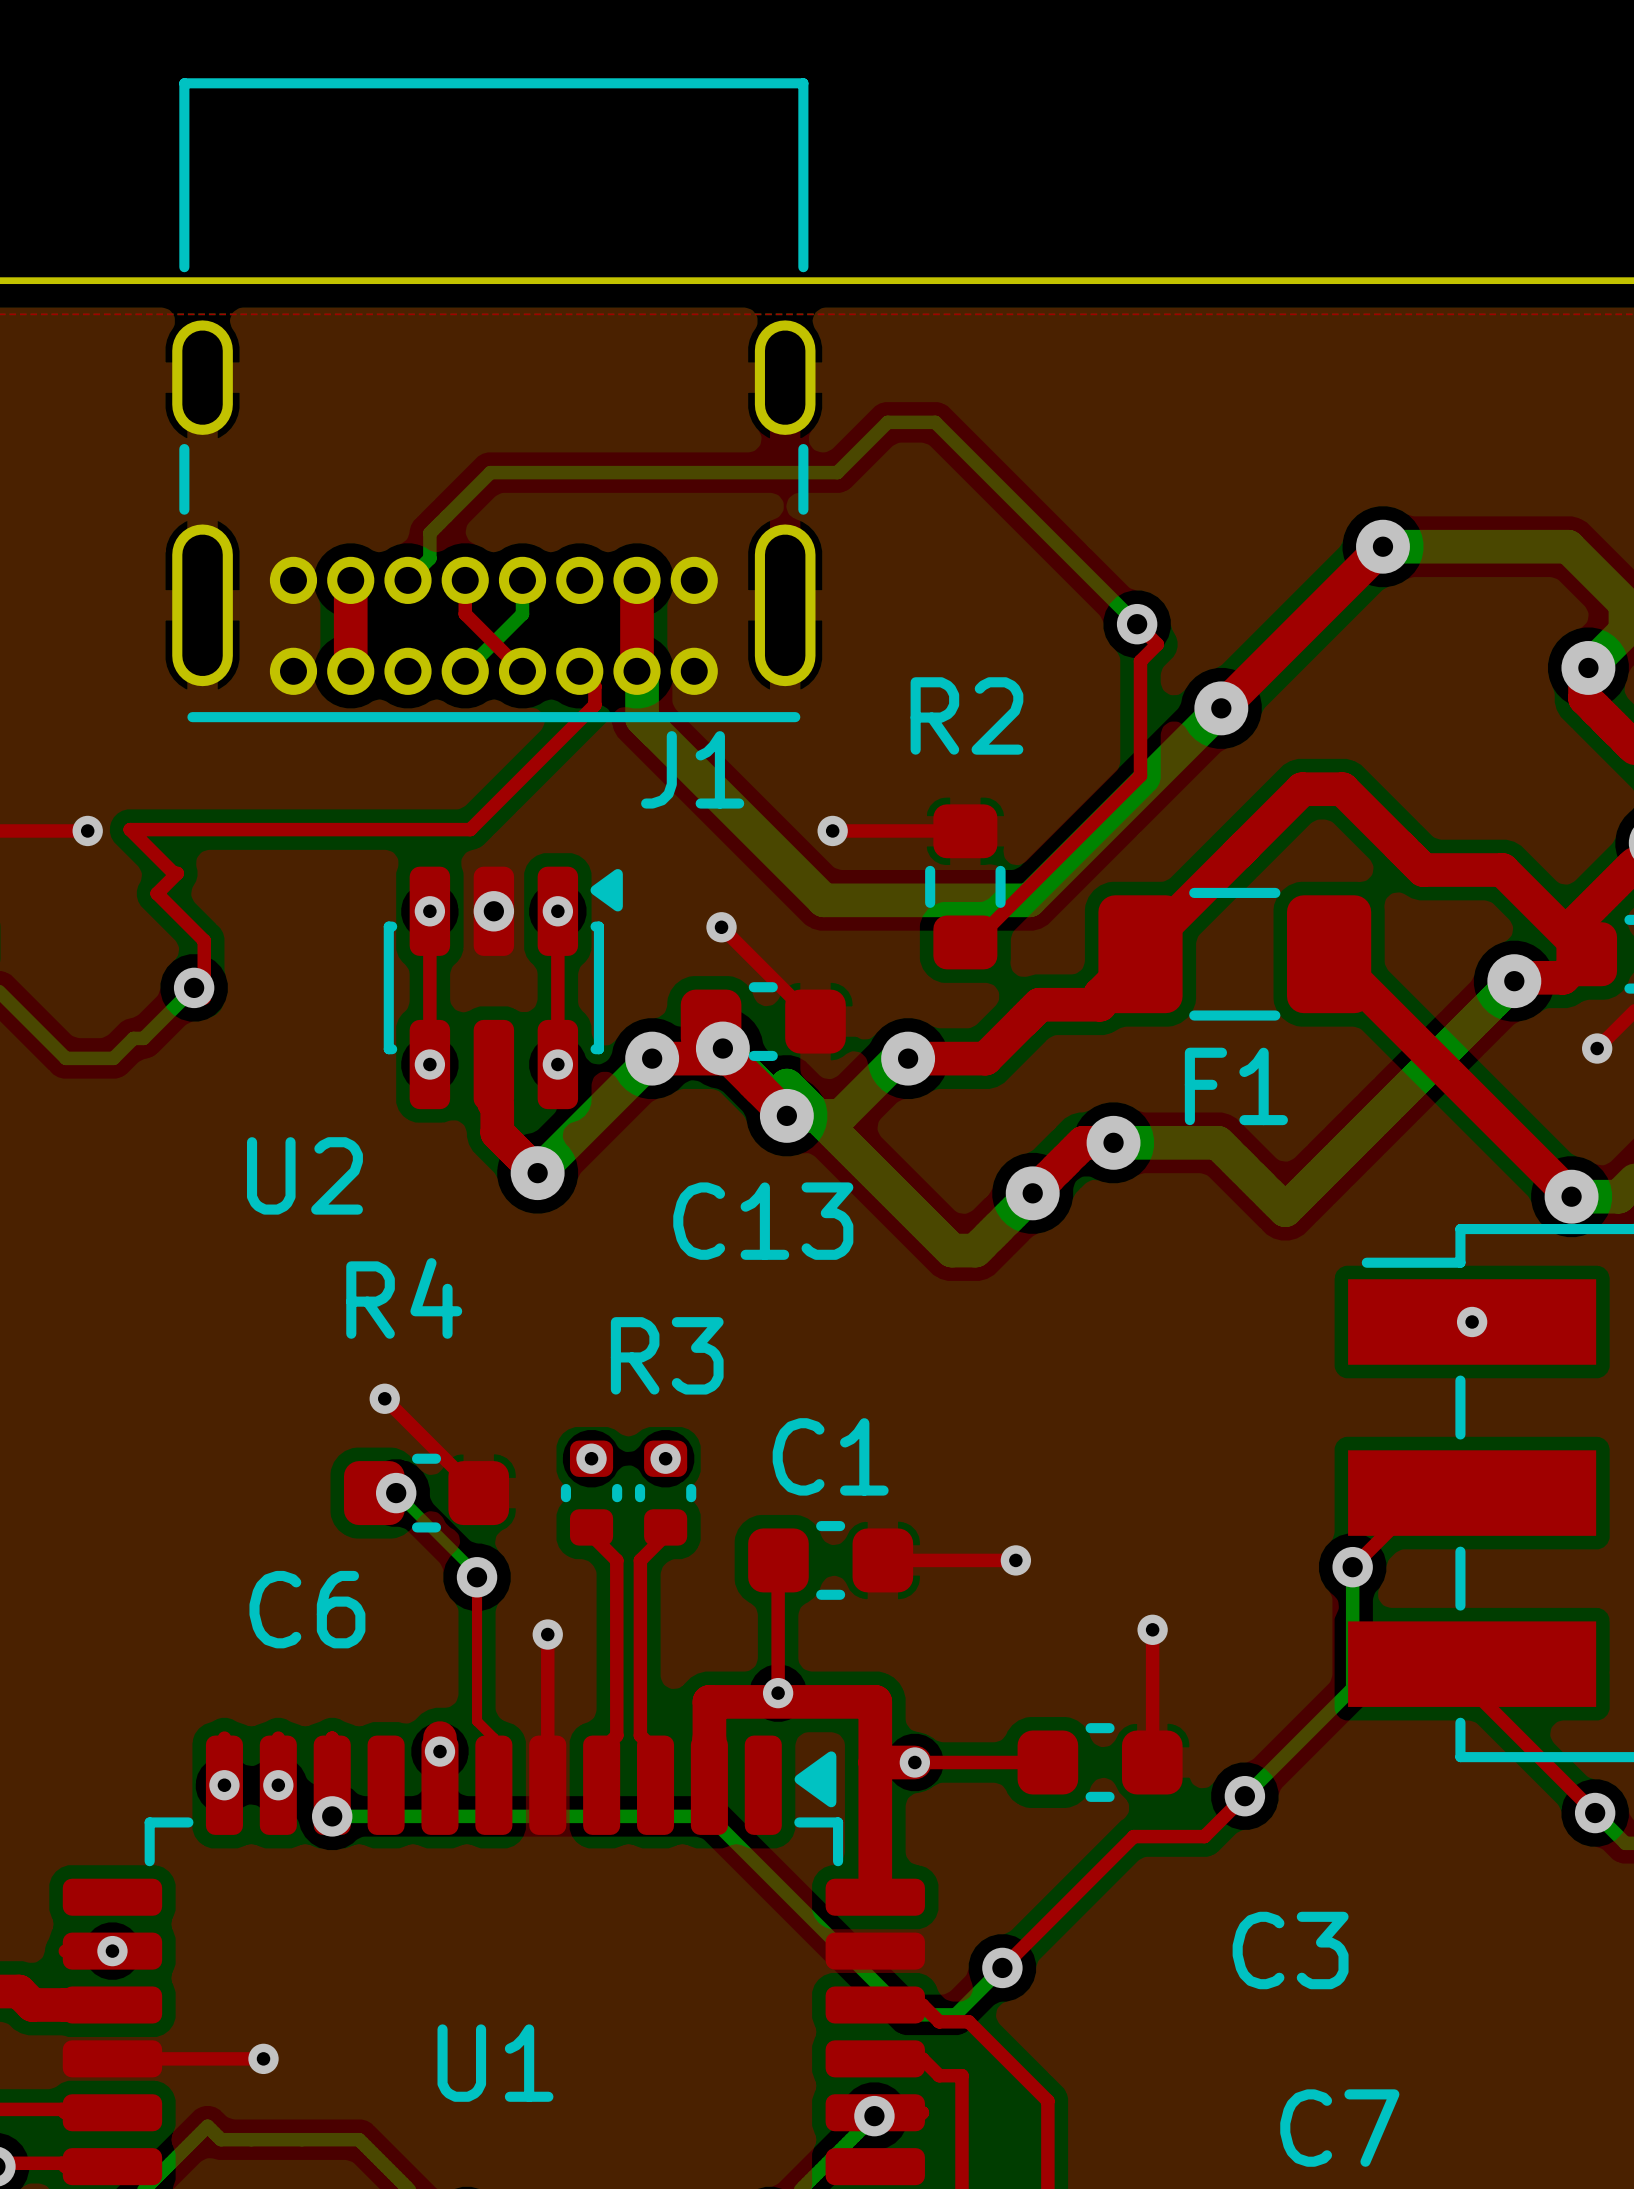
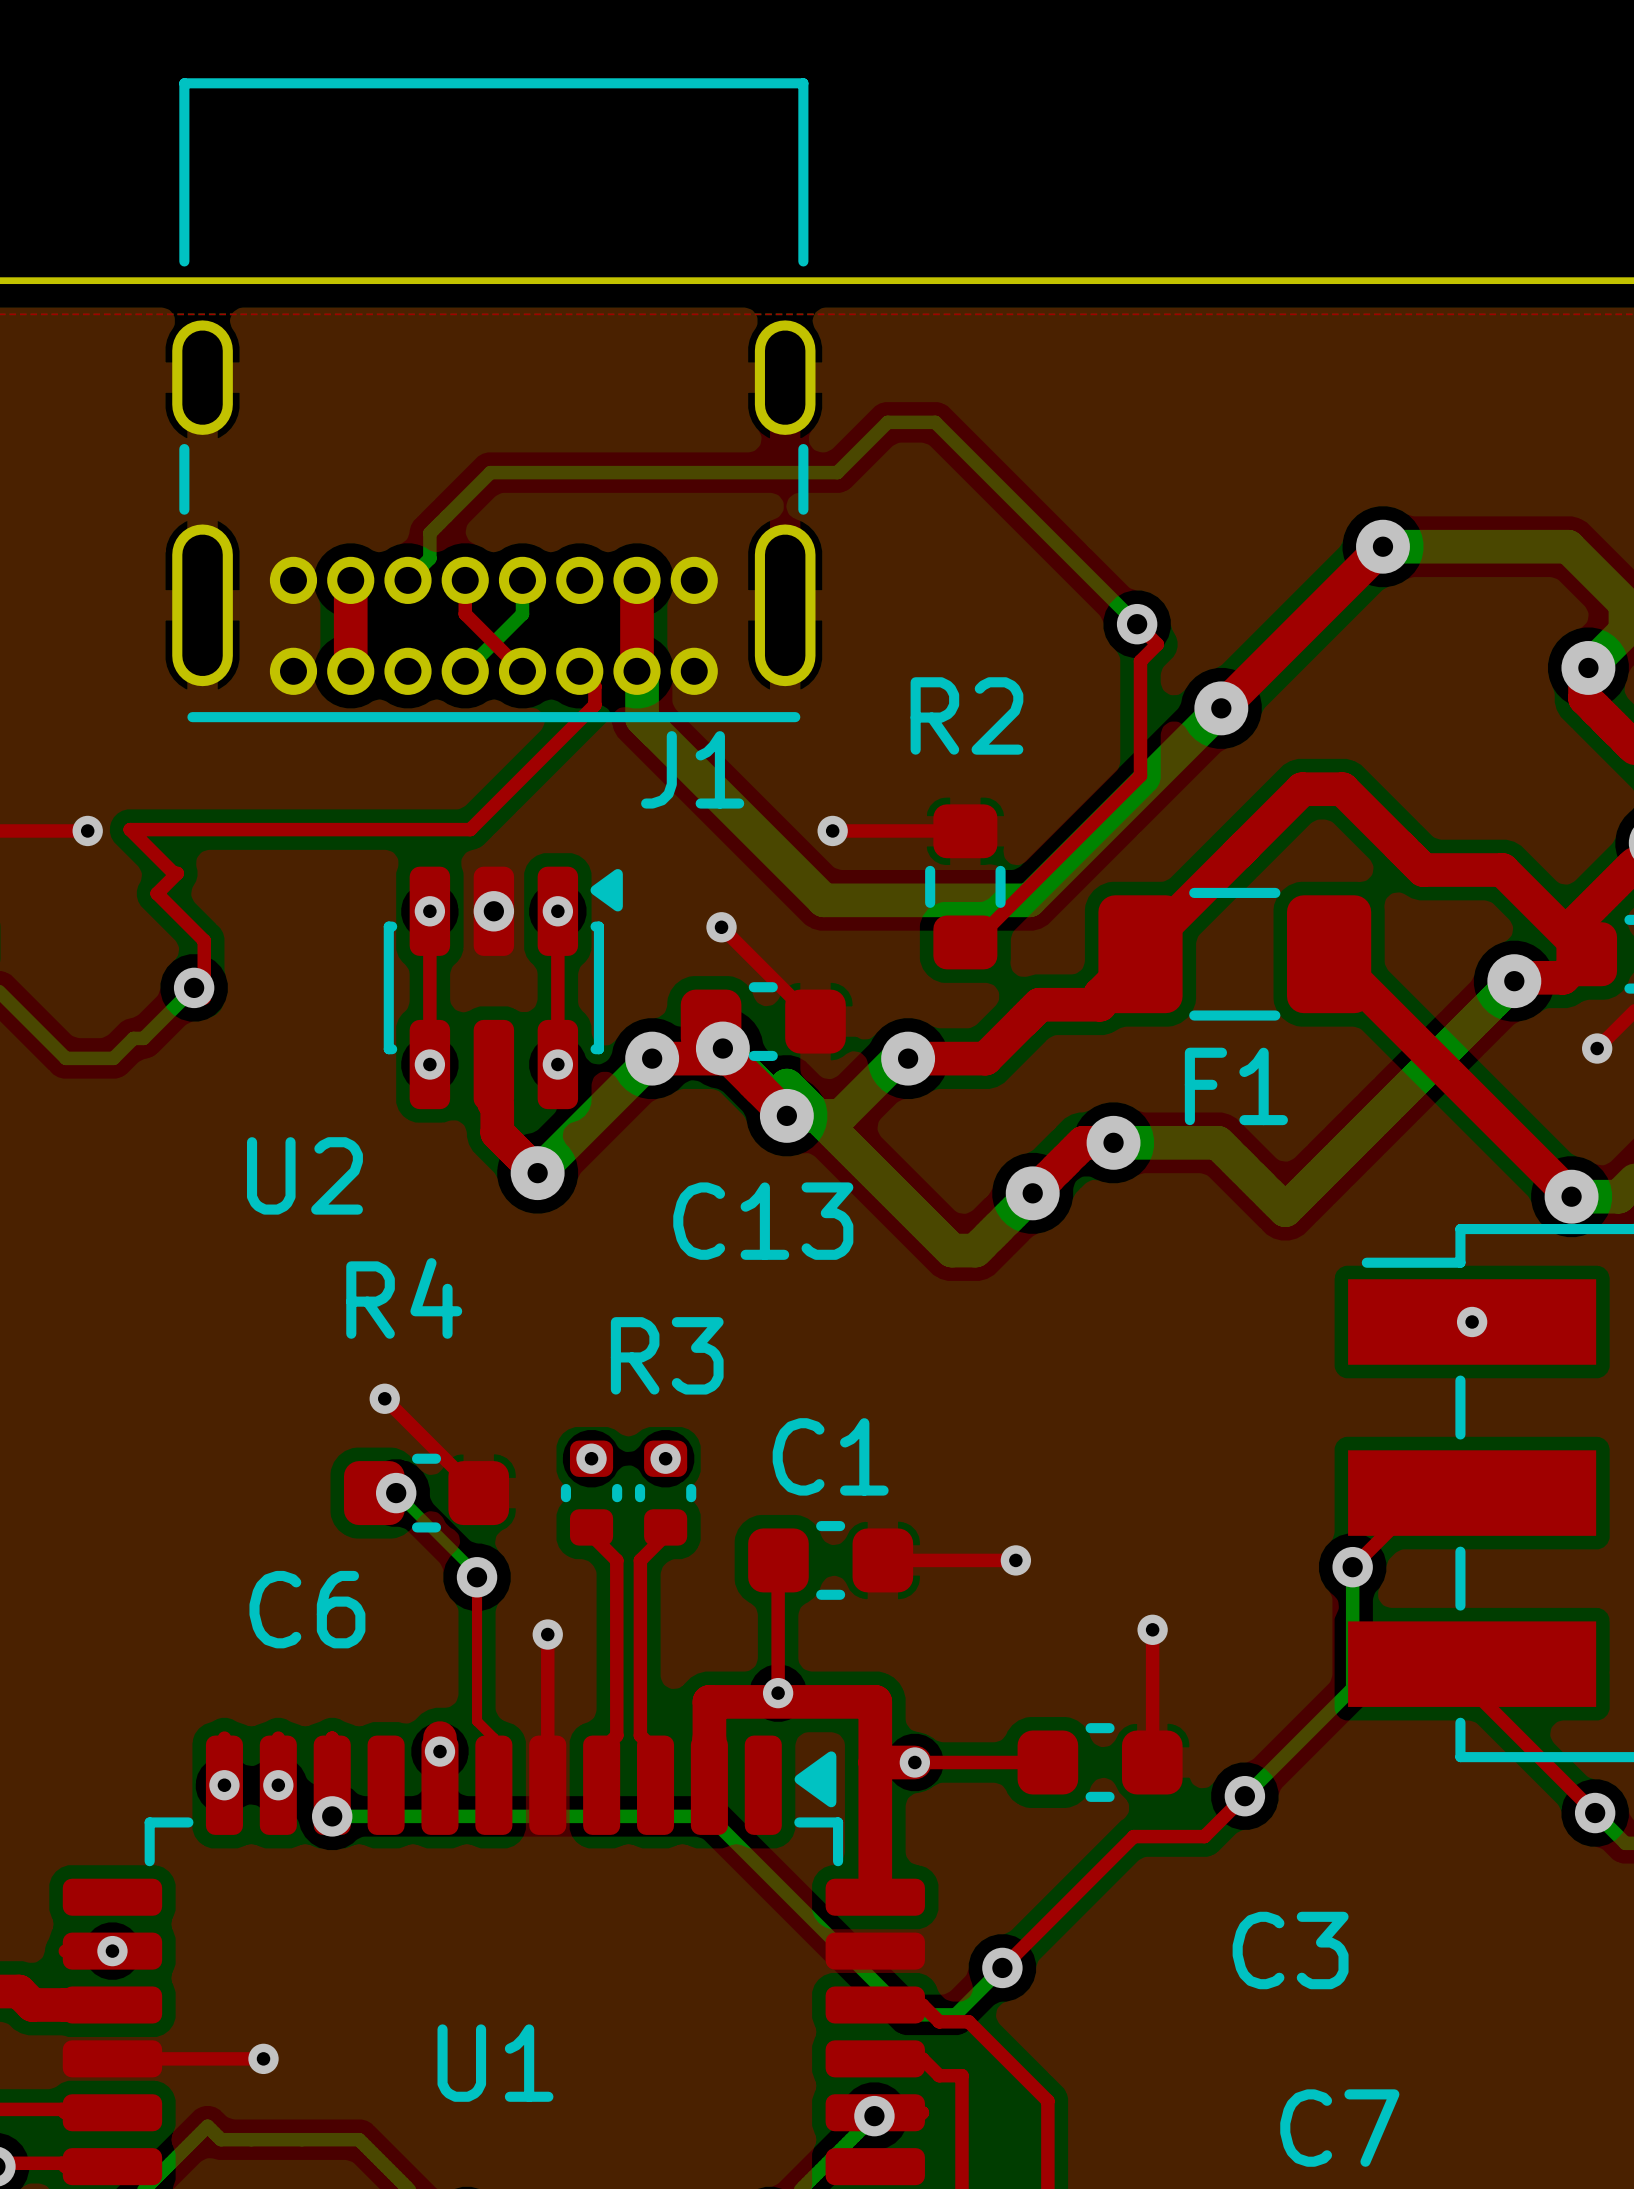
J1 footprint: [172, 78, 816, 723] -> [172, 78, 816, 723]

